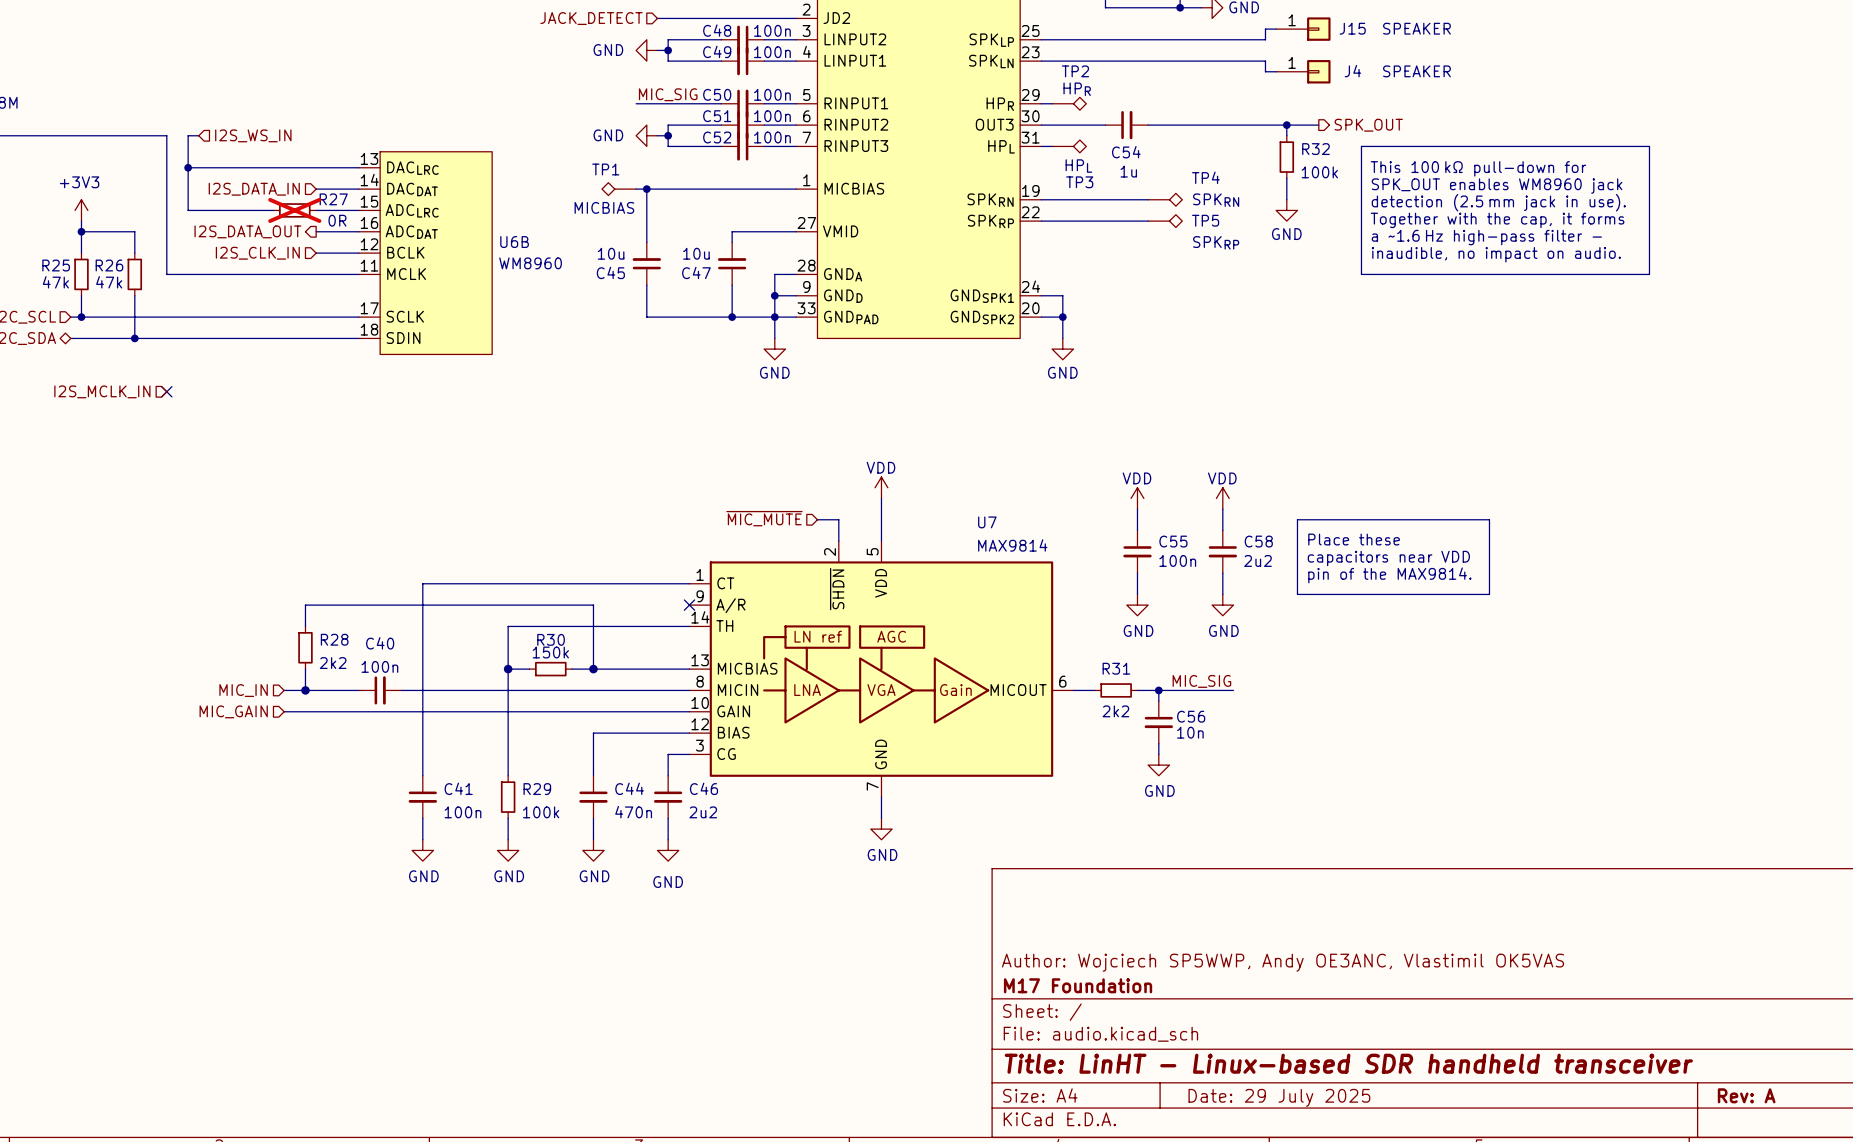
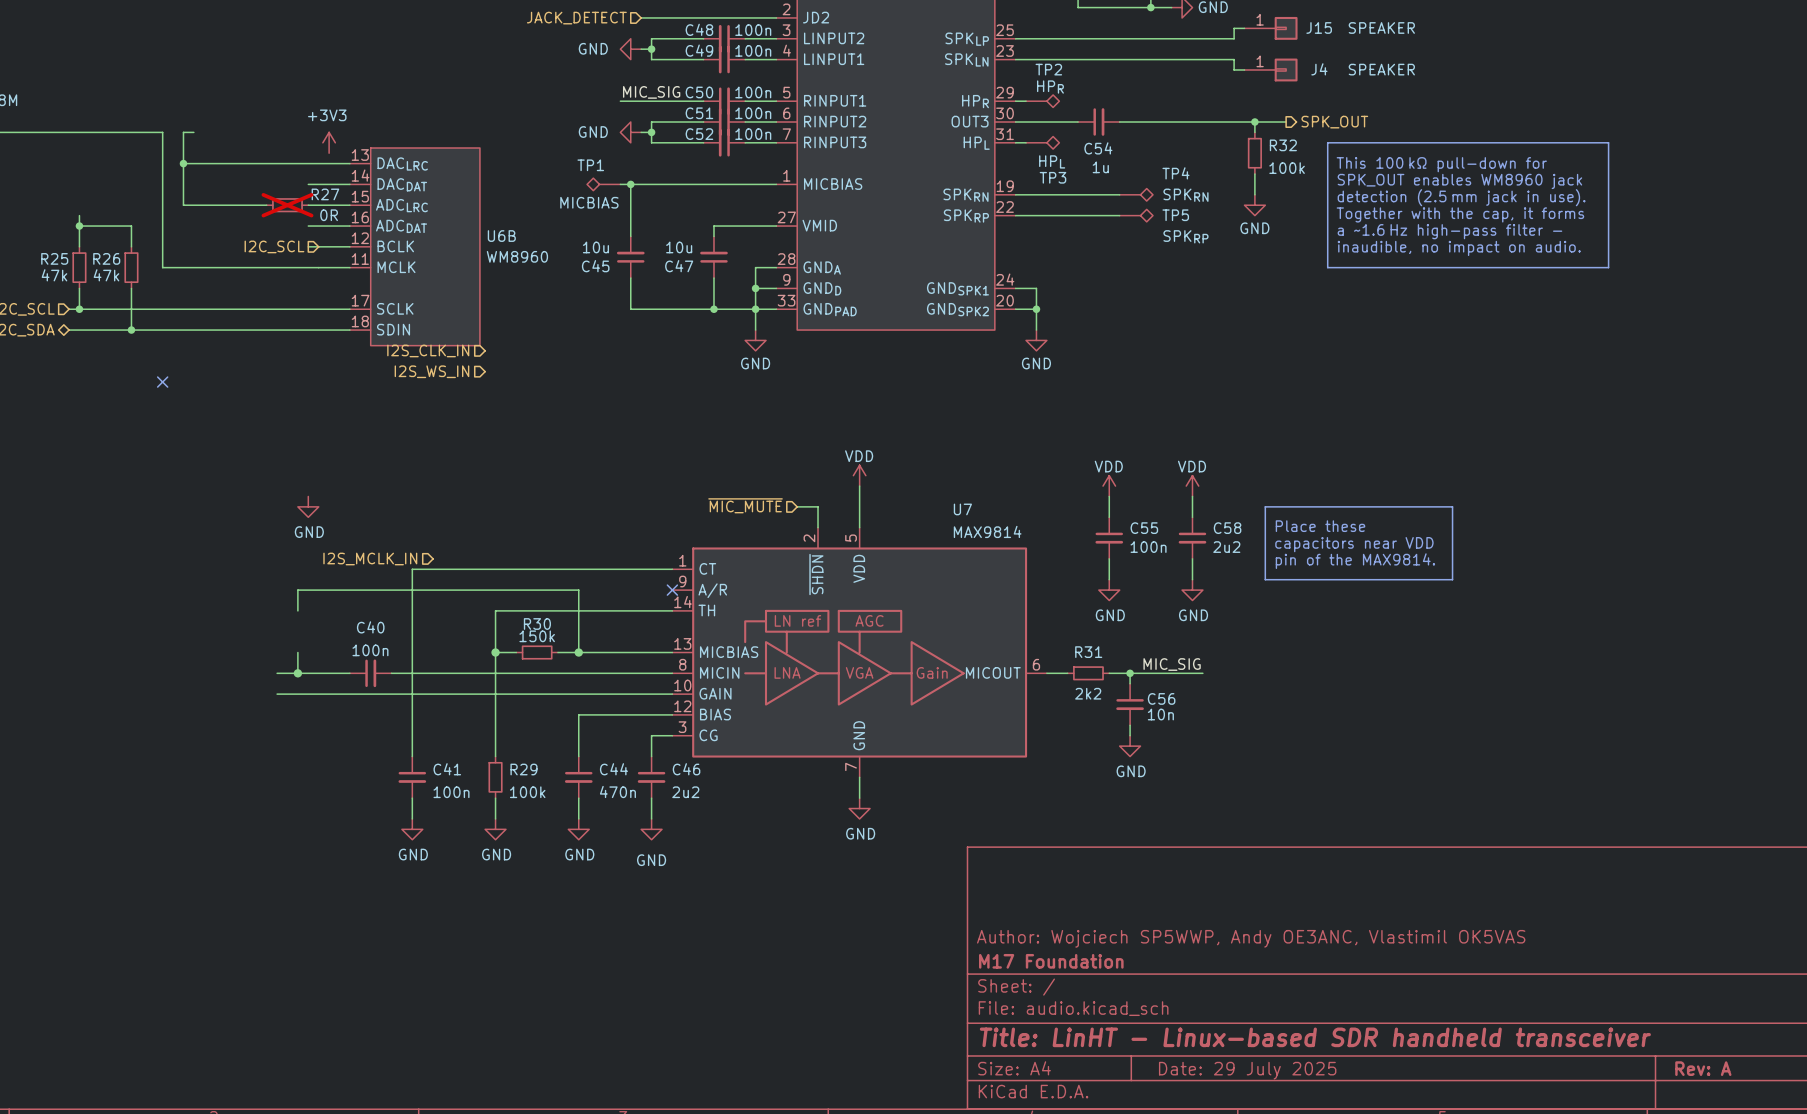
hierarchical label: I2S_WS_IN (253, 135) -> none
power symbol: none -> +3V3 (329, 142)
hierarchical label: I2S_DATA_IN (254, 189) -> none
power symbol: +3V3 (81, 210) -> none
hierarchical label: I2S_DATA_OUT (247, 231) -> none
hierarchical label: I2S_CLK_IN (257, 253) -> none
hierarchical label: none -> I2C_SCL (274, 246)
hierarchical label: none -> I2S_CLK_IN (428, 350)
hierarchical label: none -> I2S_WS_IN (431, 371)
hierarchical label: I2S_MCLK_IN (102, 391) -> none
power symbol: none -> GND (308, 506)
hierarchical label: none -> I2S_MCLK_IN (370, 559)
R28: 2k2 (305, 647) -> none
hierarchical label: MIC_IN (243, 690) -> none
hierarchical label: MIC_GAIN (233, 711) -> none

